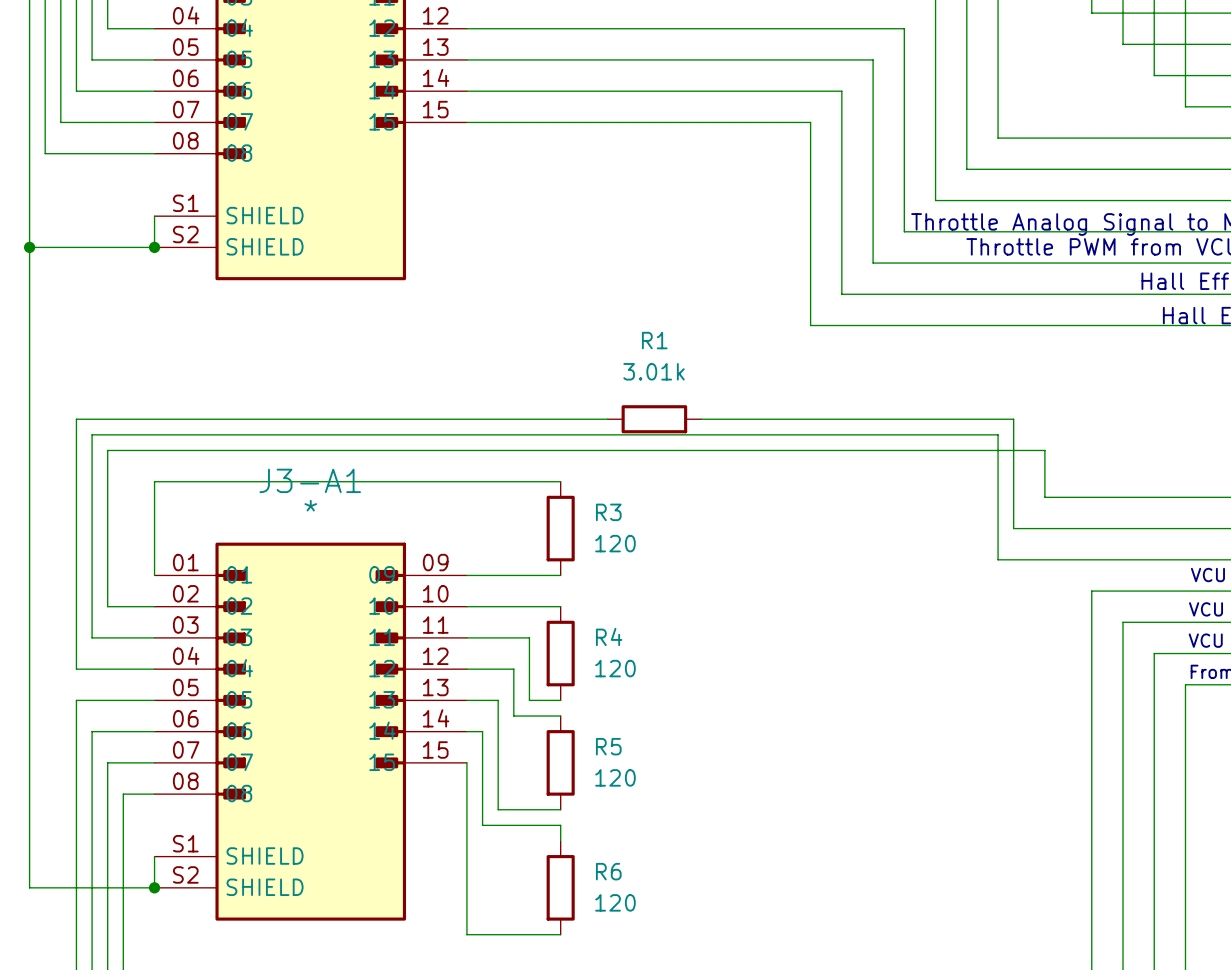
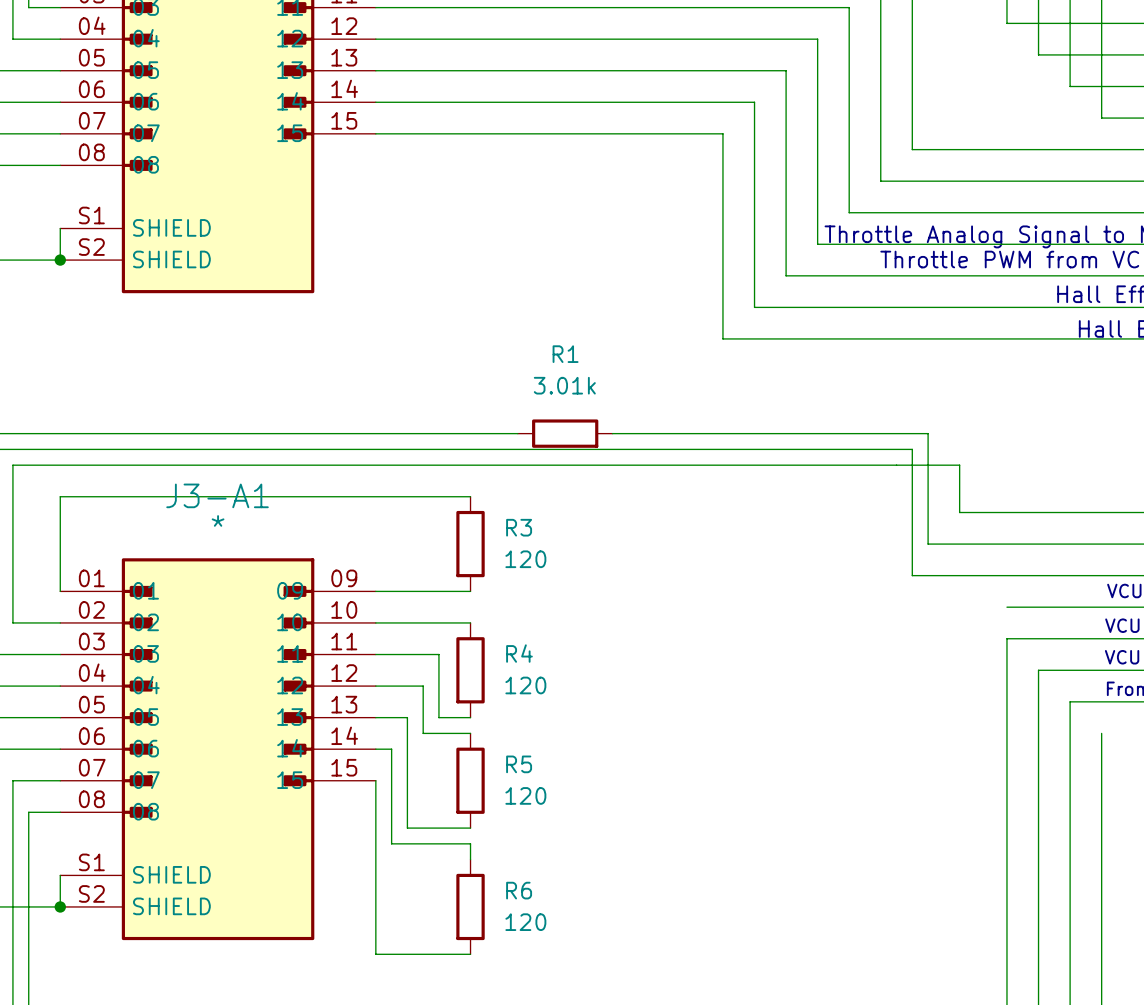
wire: (1091, 591) (1091, 622) -> (1038, 638) (1006, 638)
wire: (1123, 622) (1123, 653) -> none
wire: (1154, 653) (1154, 684) -> (1070, 670) (1038, 670)
wire: (1185, 684) (1185, 716) -> (1101, 701) (1070, 701)

